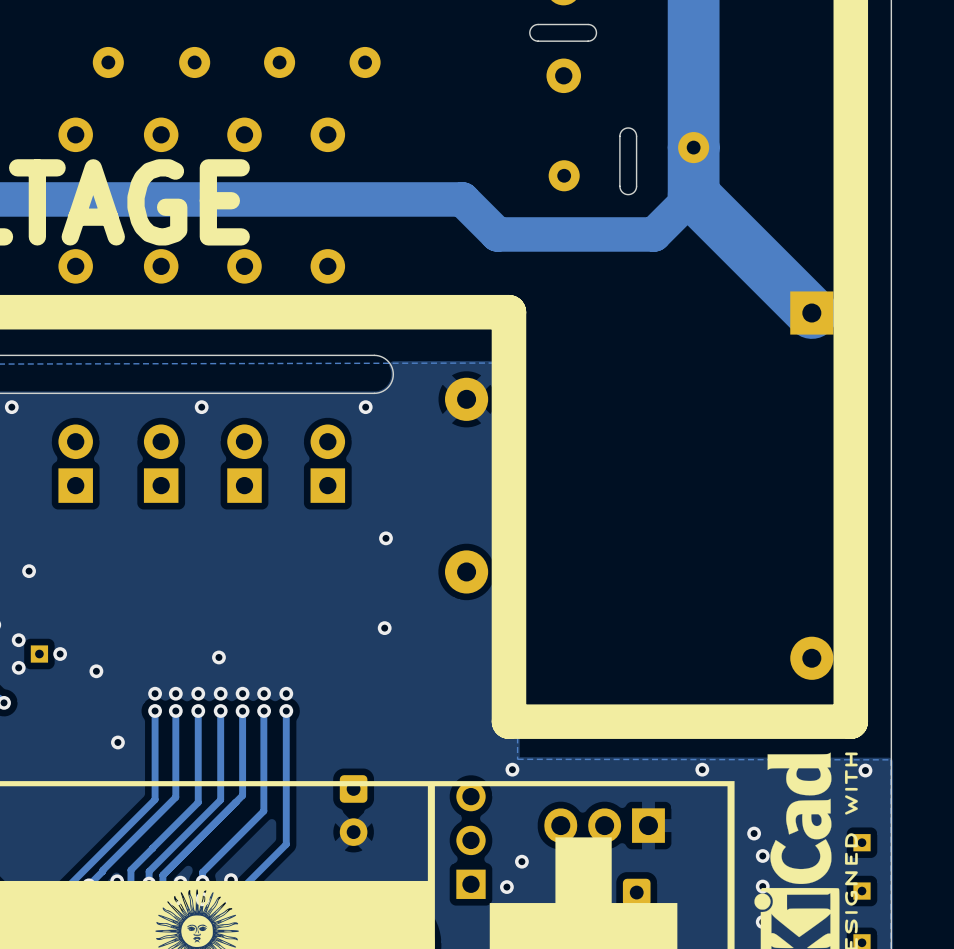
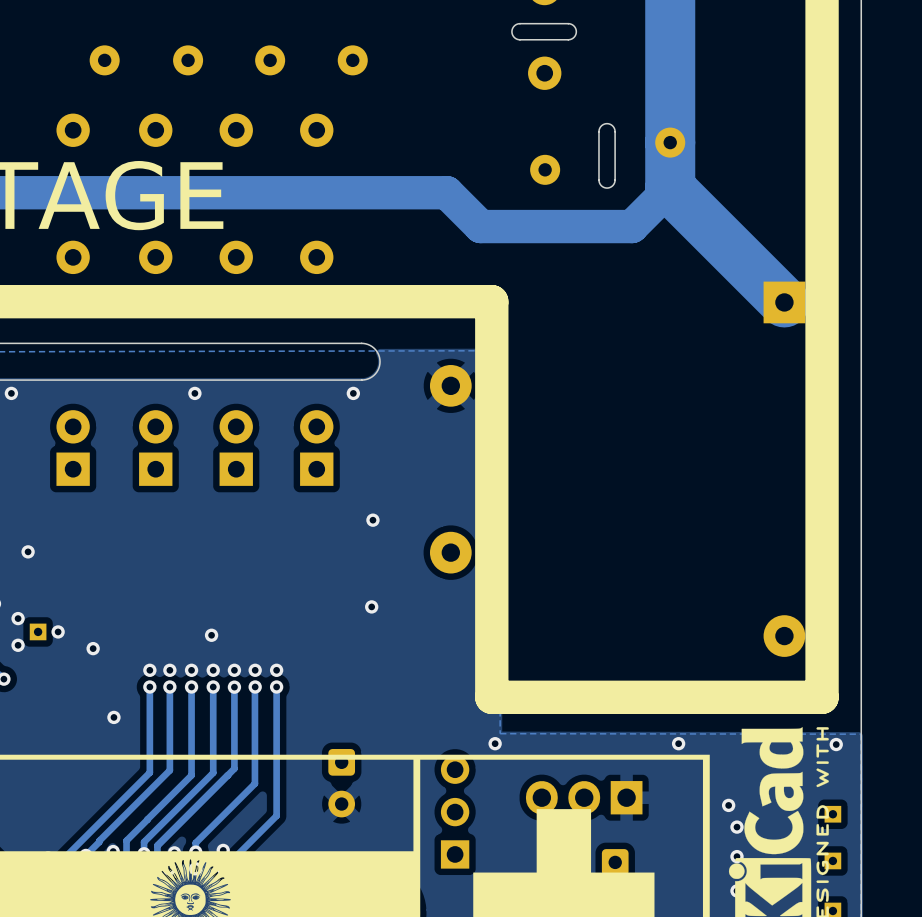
via: (521, 861) -> none
via: (506, 887) -> none

